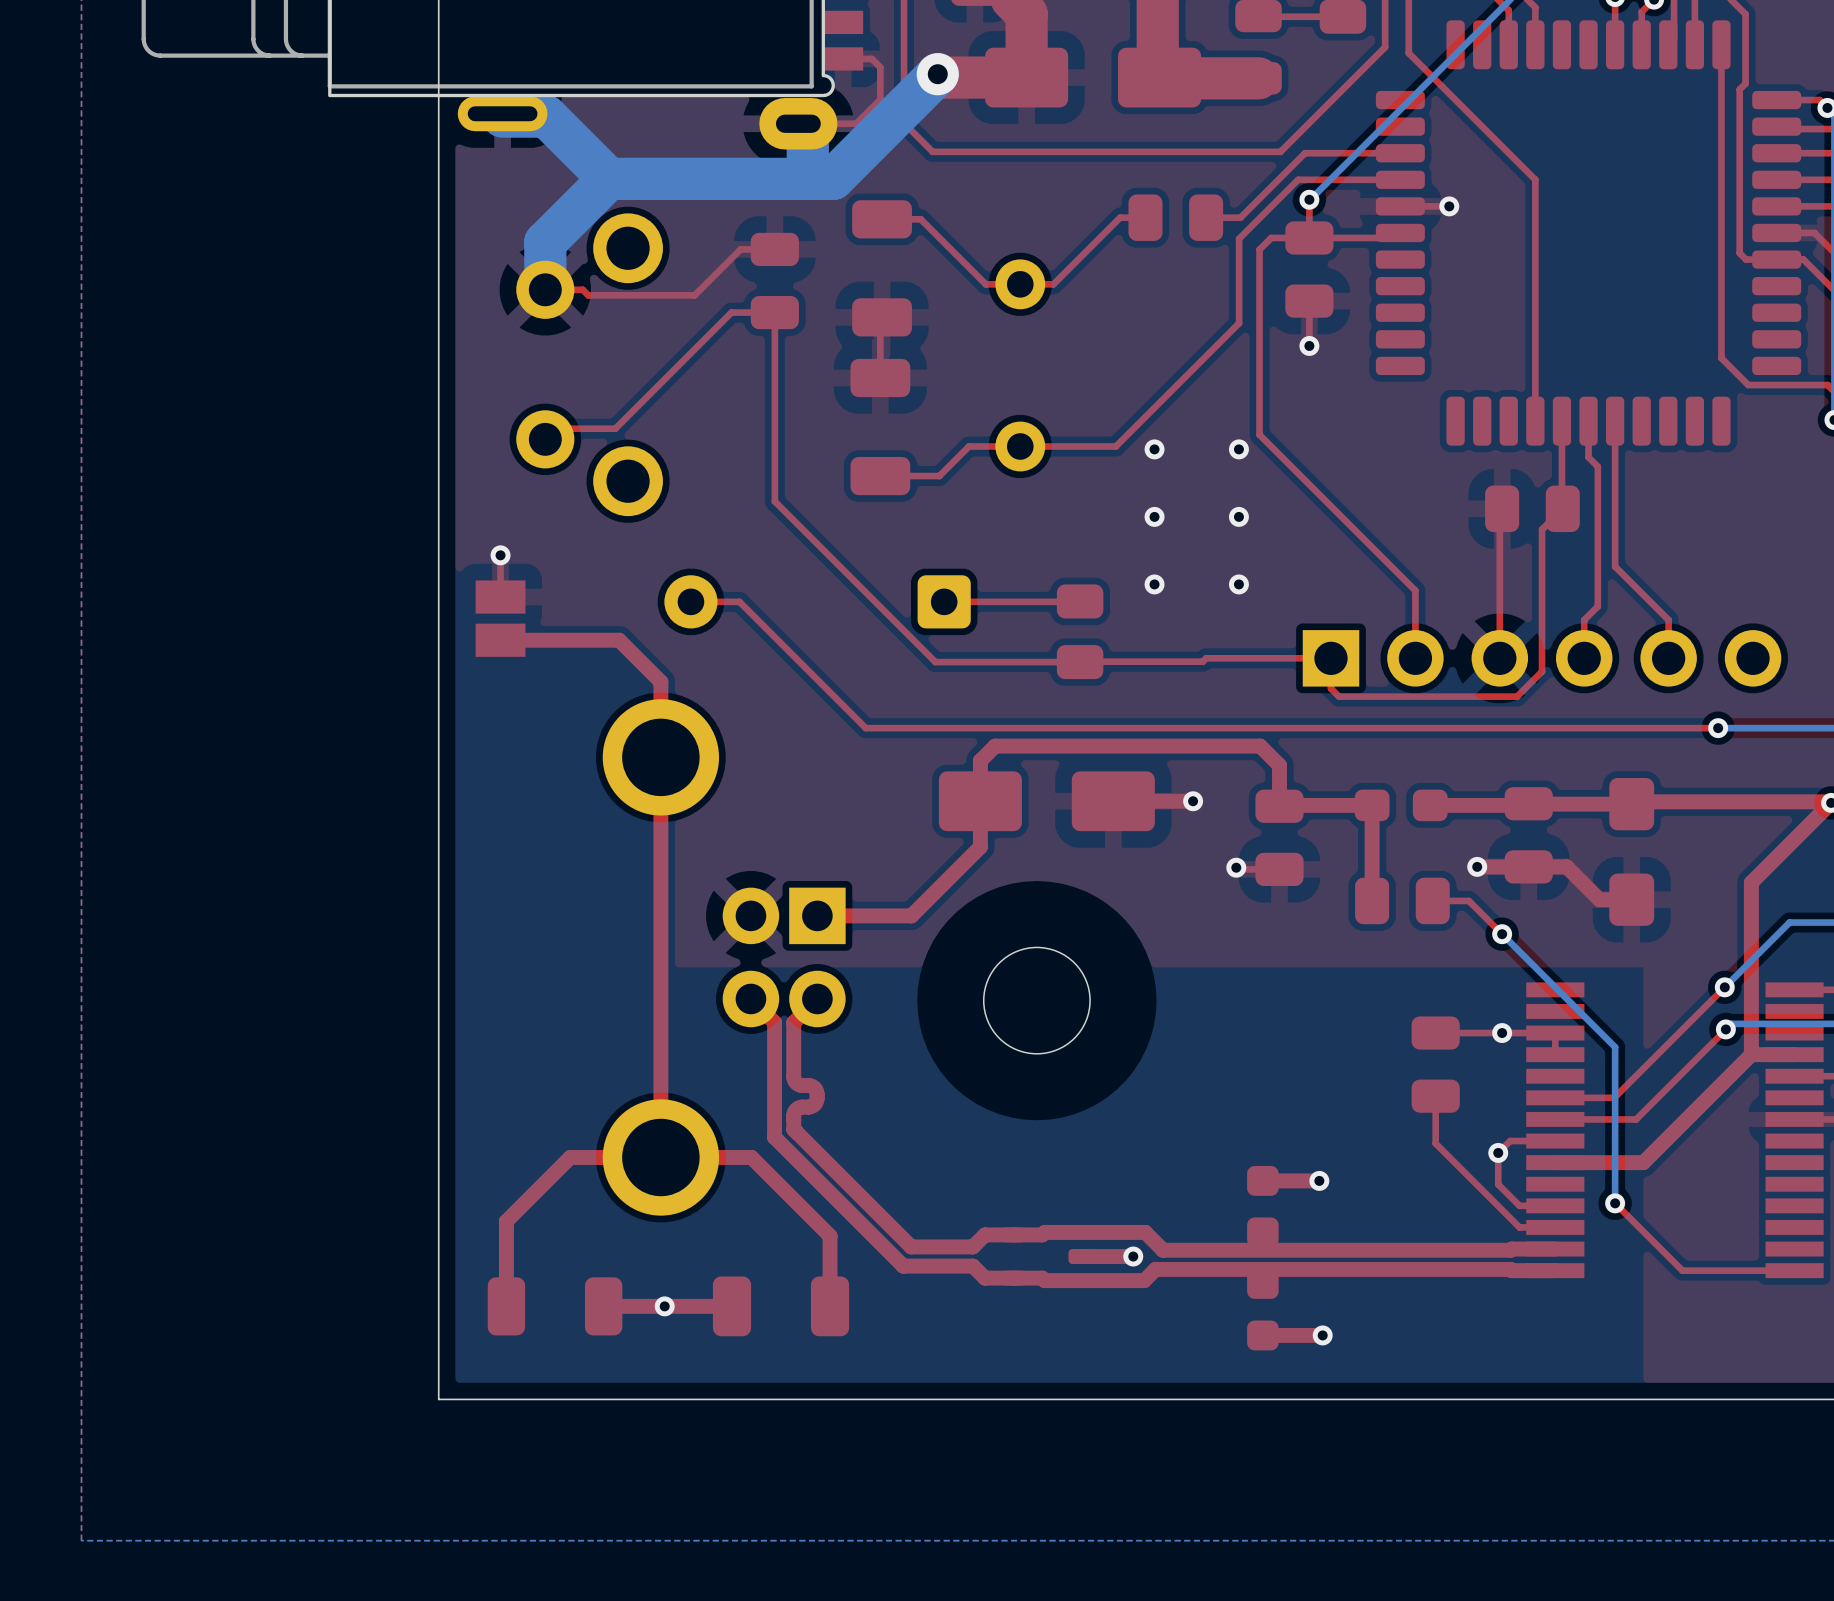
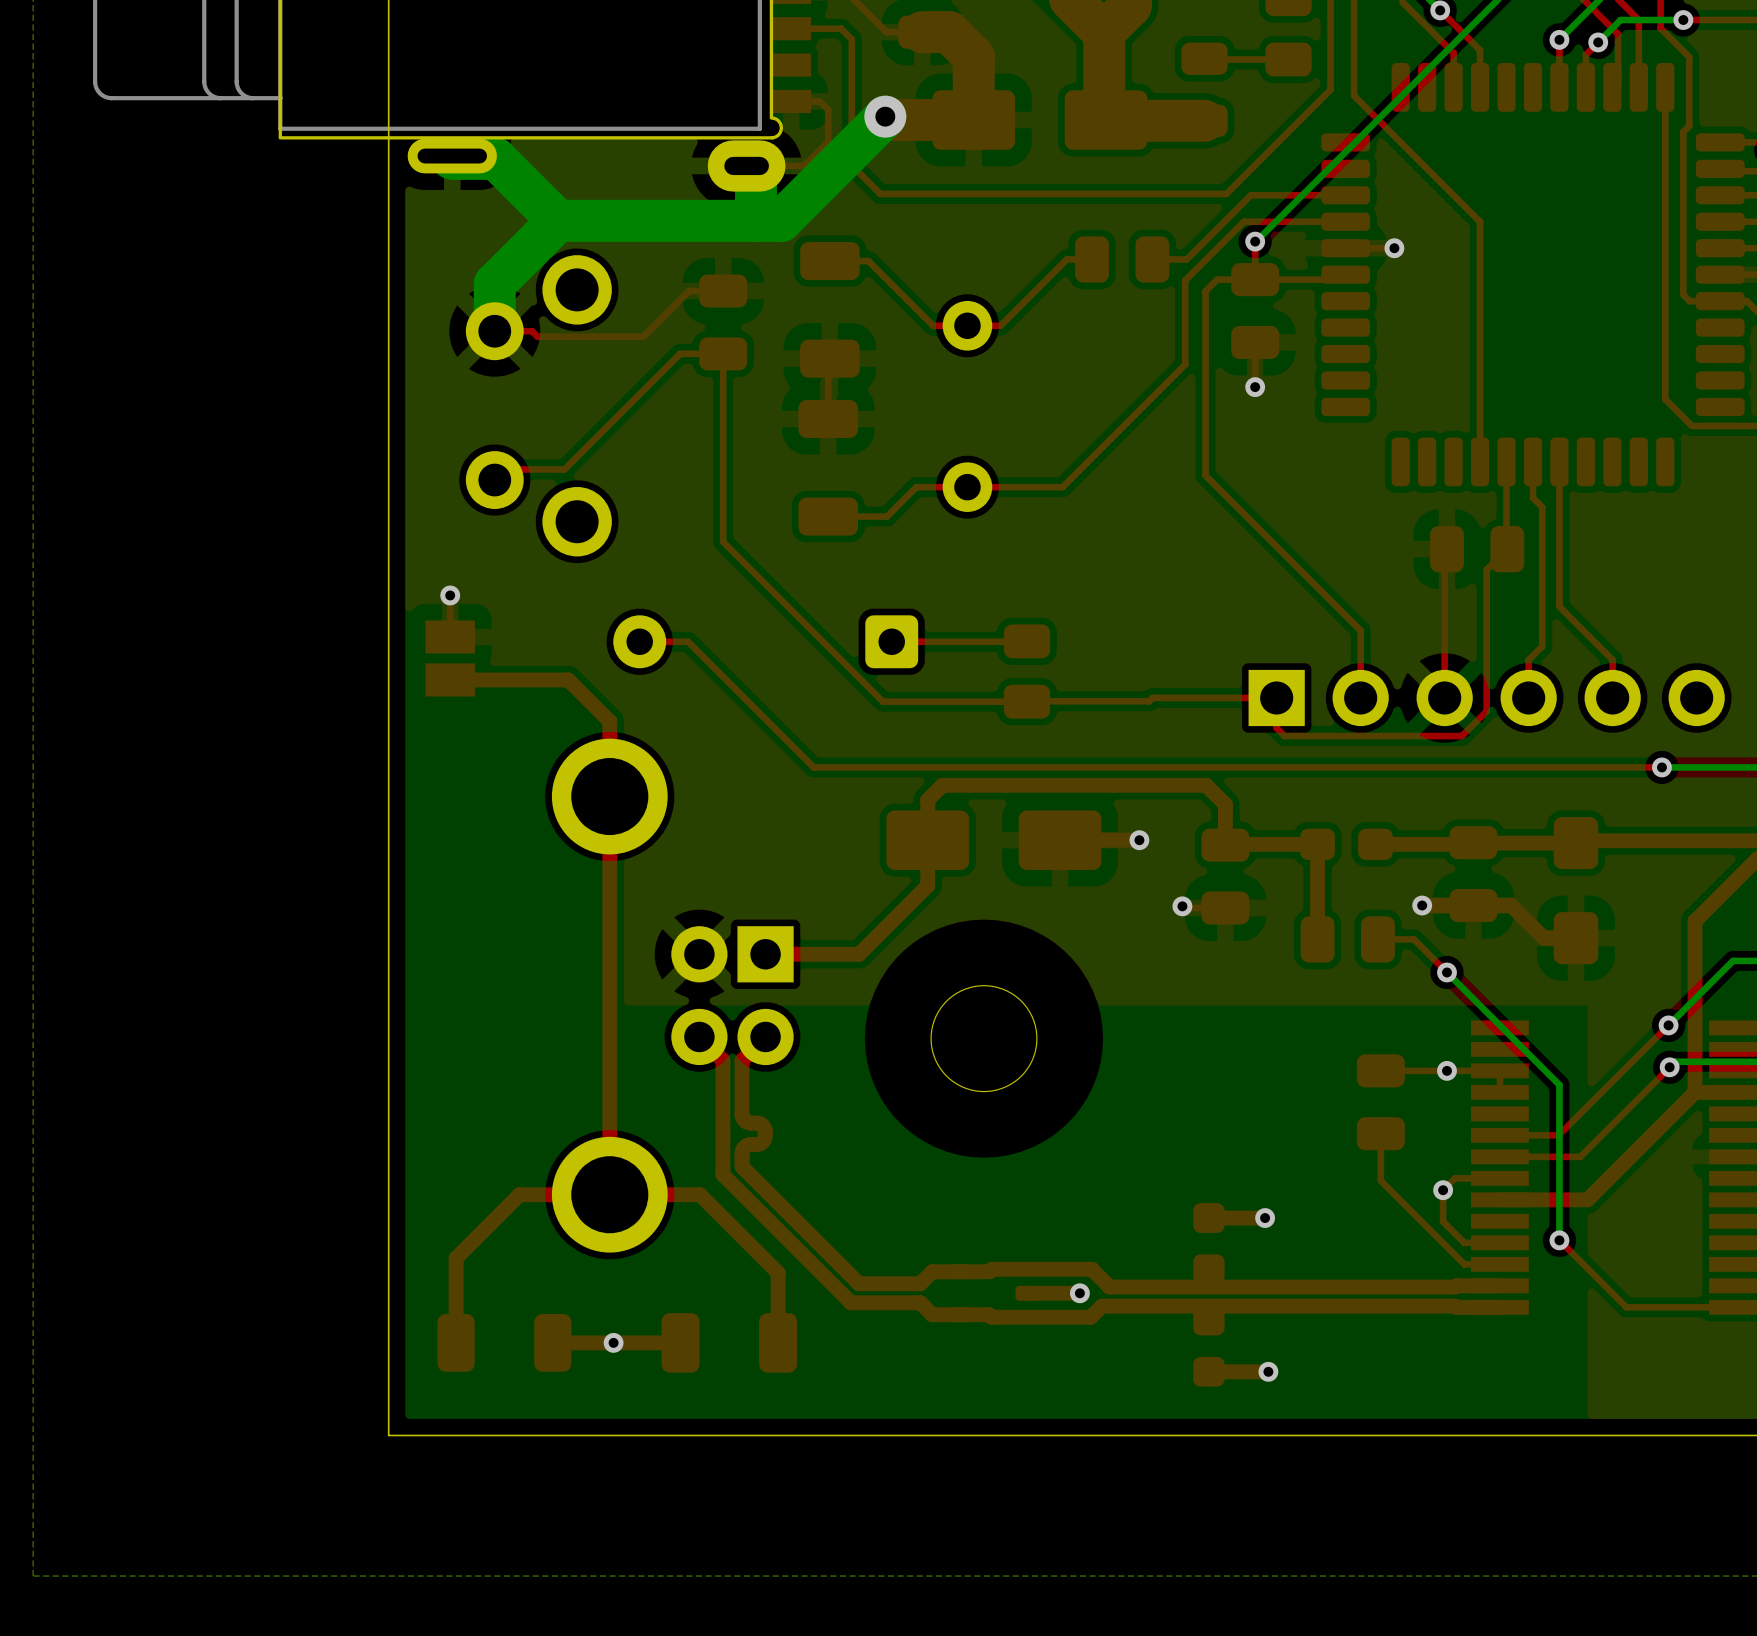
via: (1154, 449) -> none
via: (1238, 449) -> none
via: (1154, 516) -> none
via: (1238, 516) -> none
via: (1154, 584) -> none
via: (1238, 584) -> none

